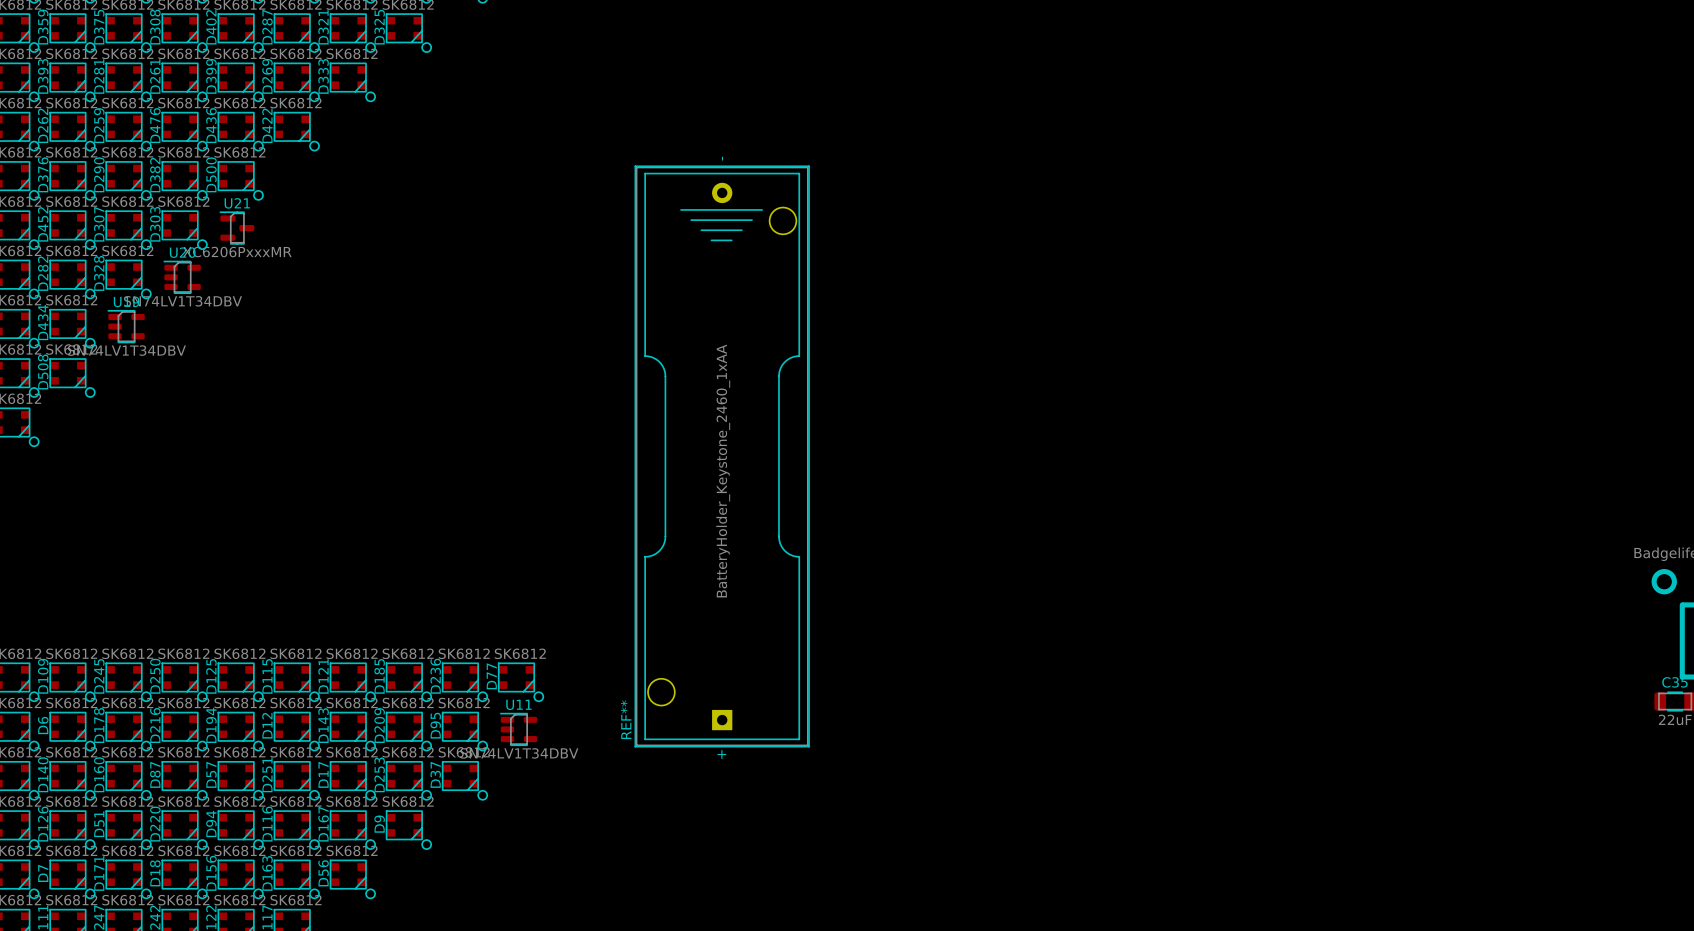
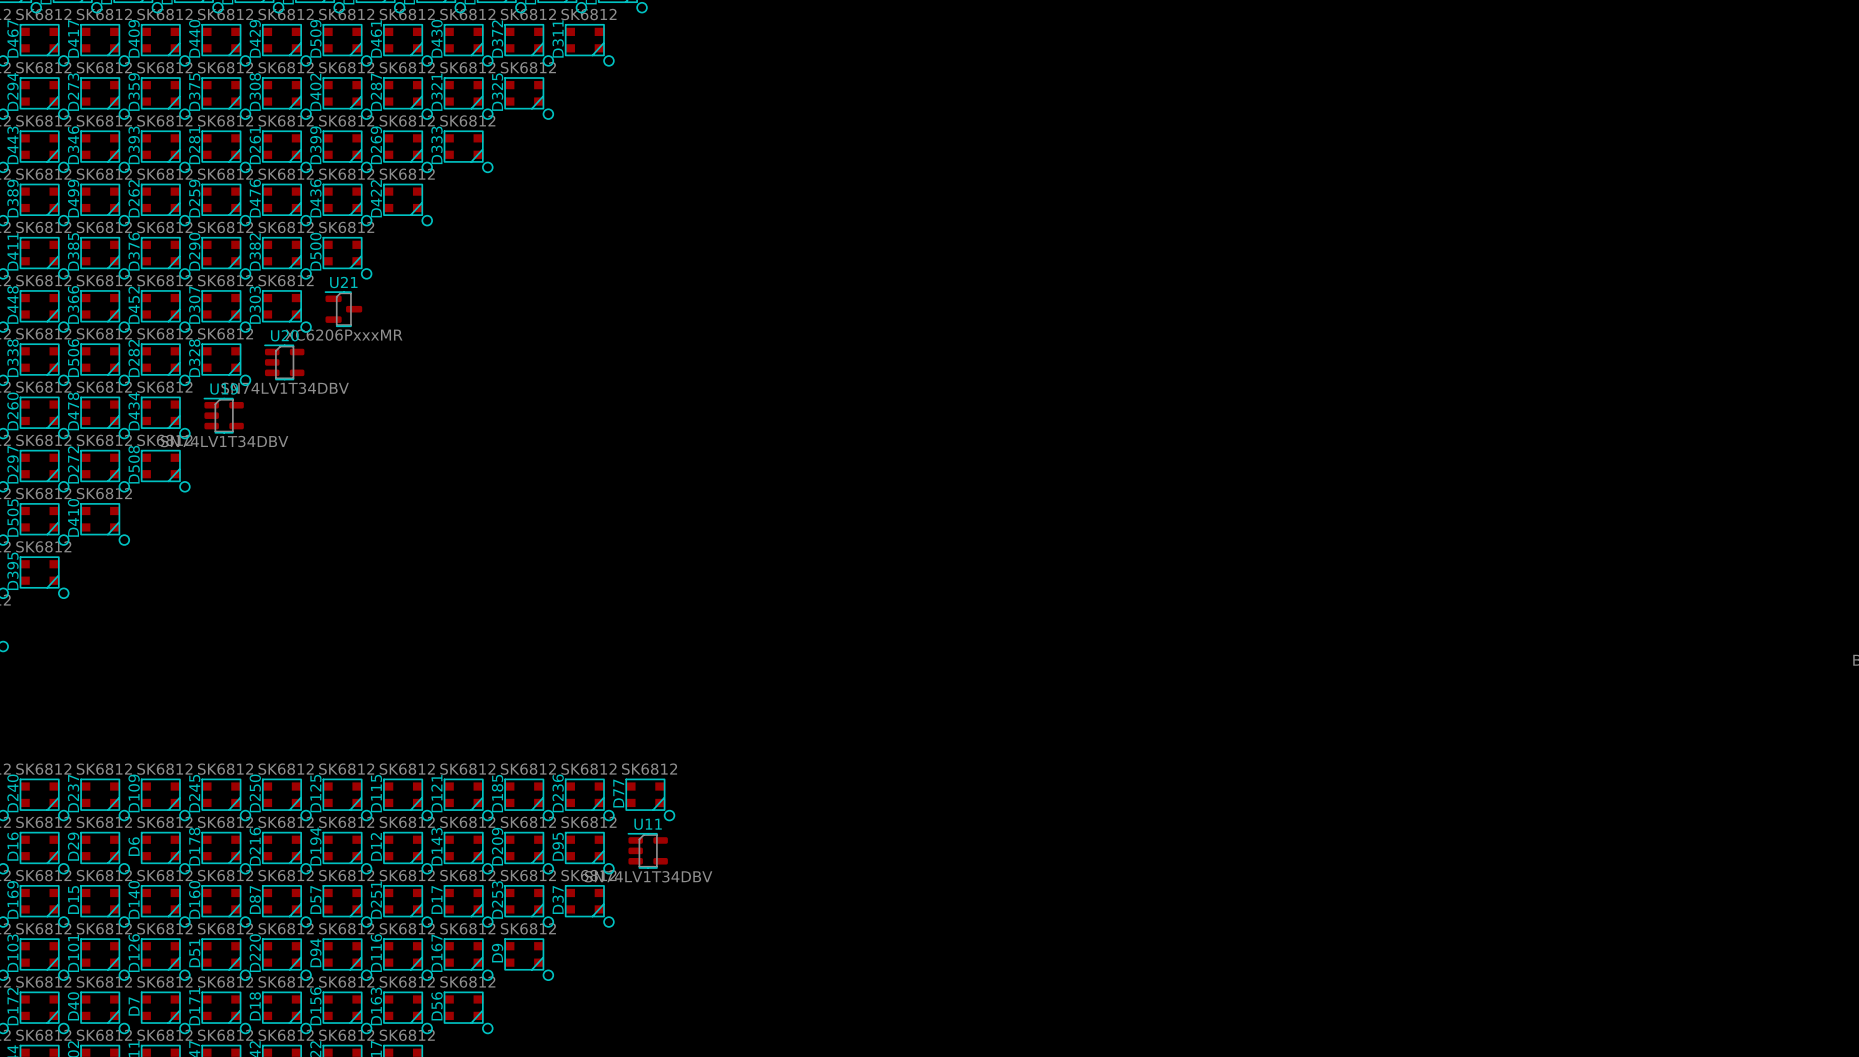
REF**: BatteryHolder_Keystone_2460_1xAA (722, 456) -> none

